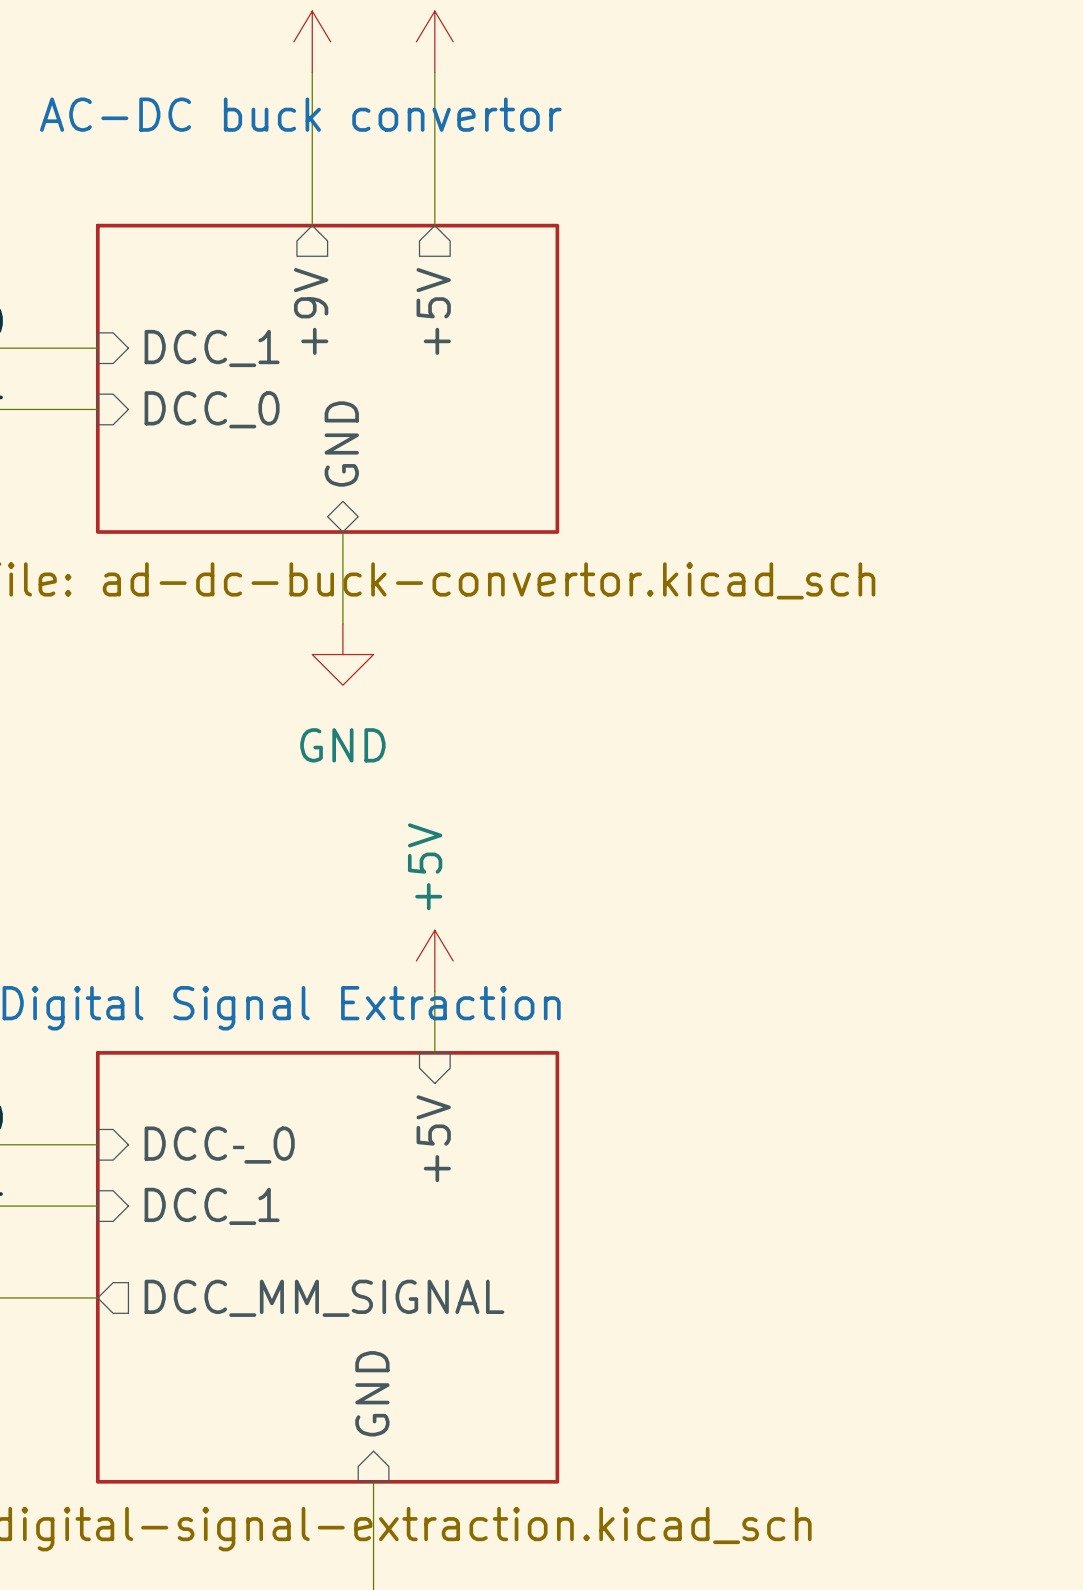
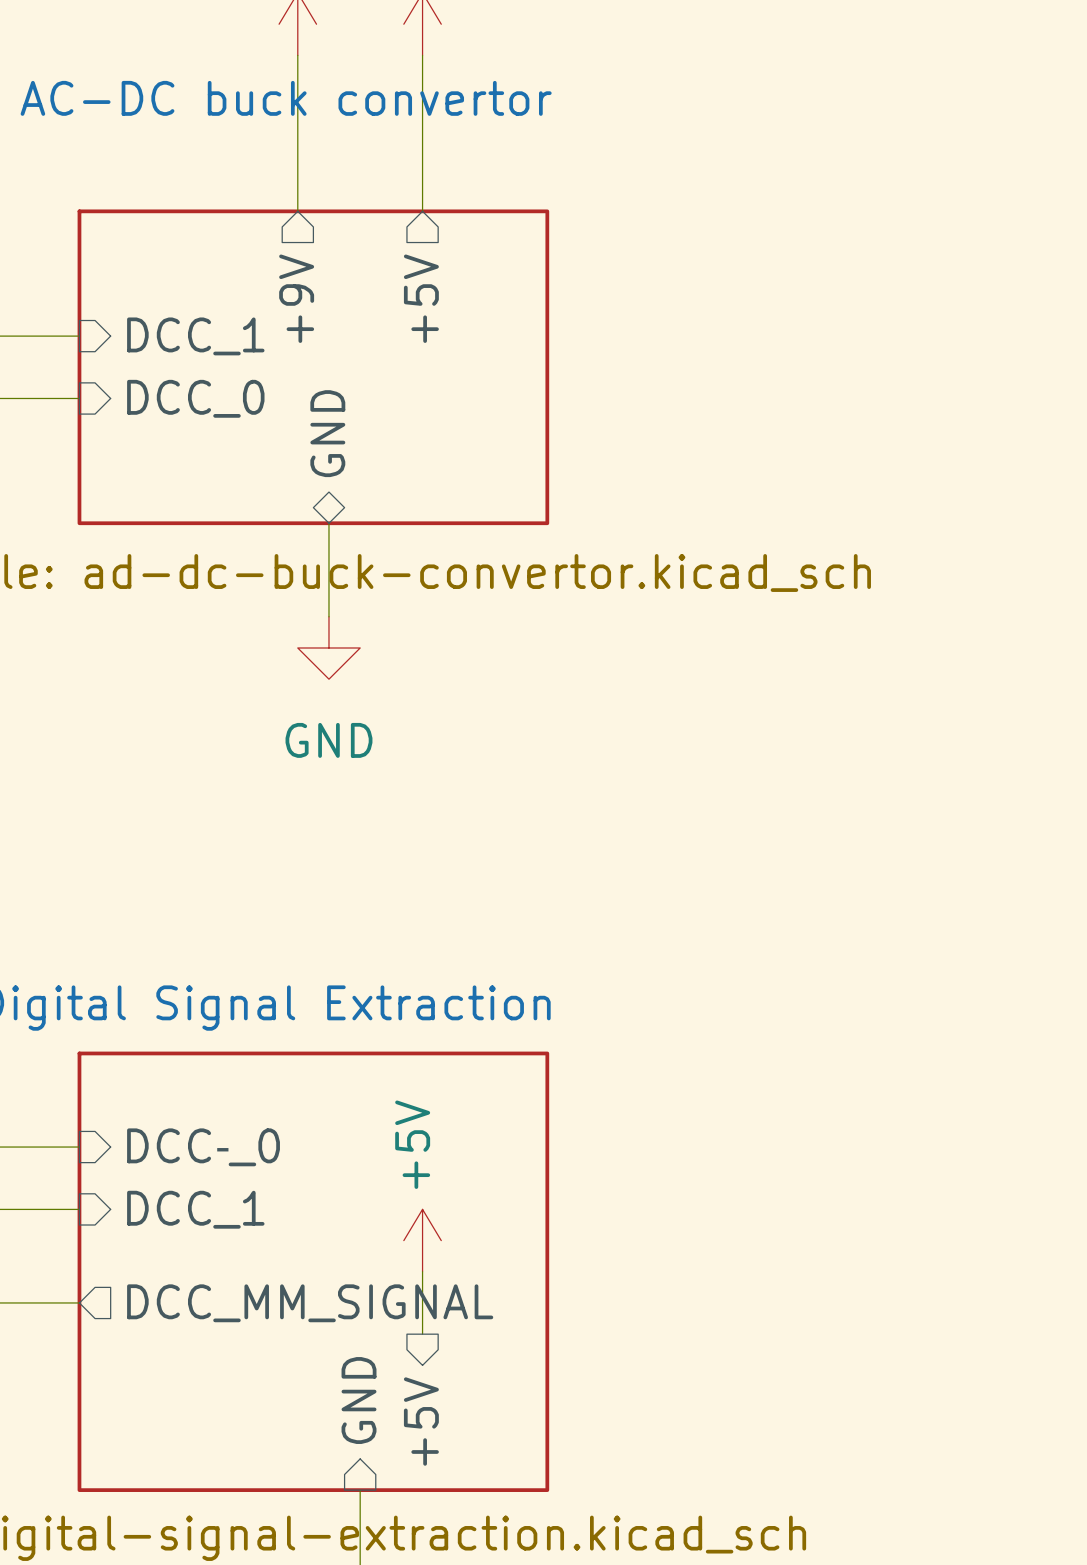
power symbol position: +5V (434, 960) -> +5V (422, 1240)
wire: (434, 991) (434, 1052) -> (422, 1271) (422, 1334)
sheet pin position: +5V (433, 1138) -> +5V (421, 1421)

